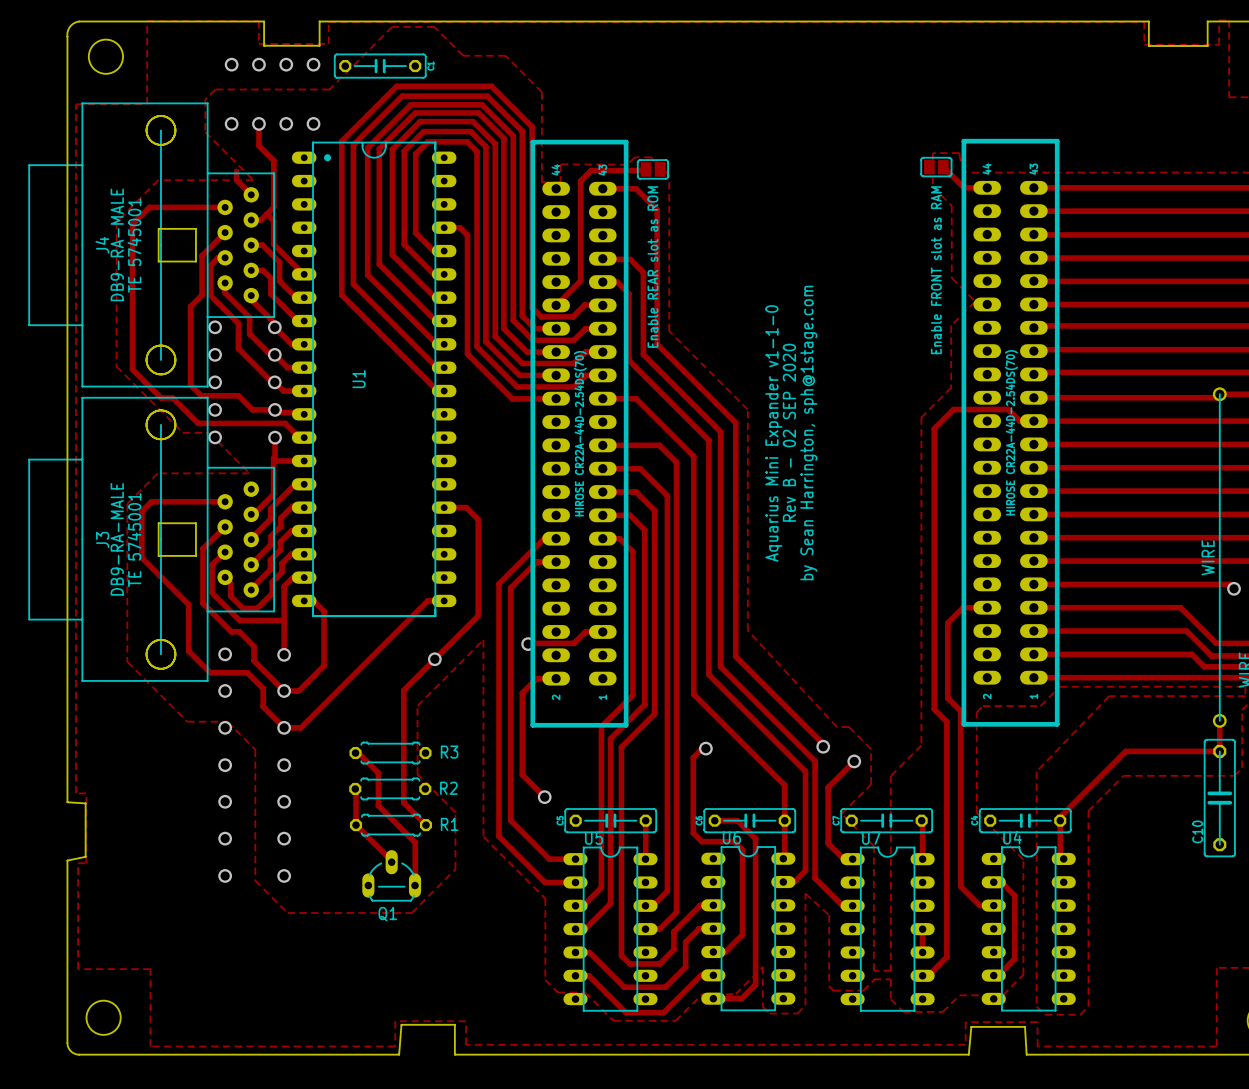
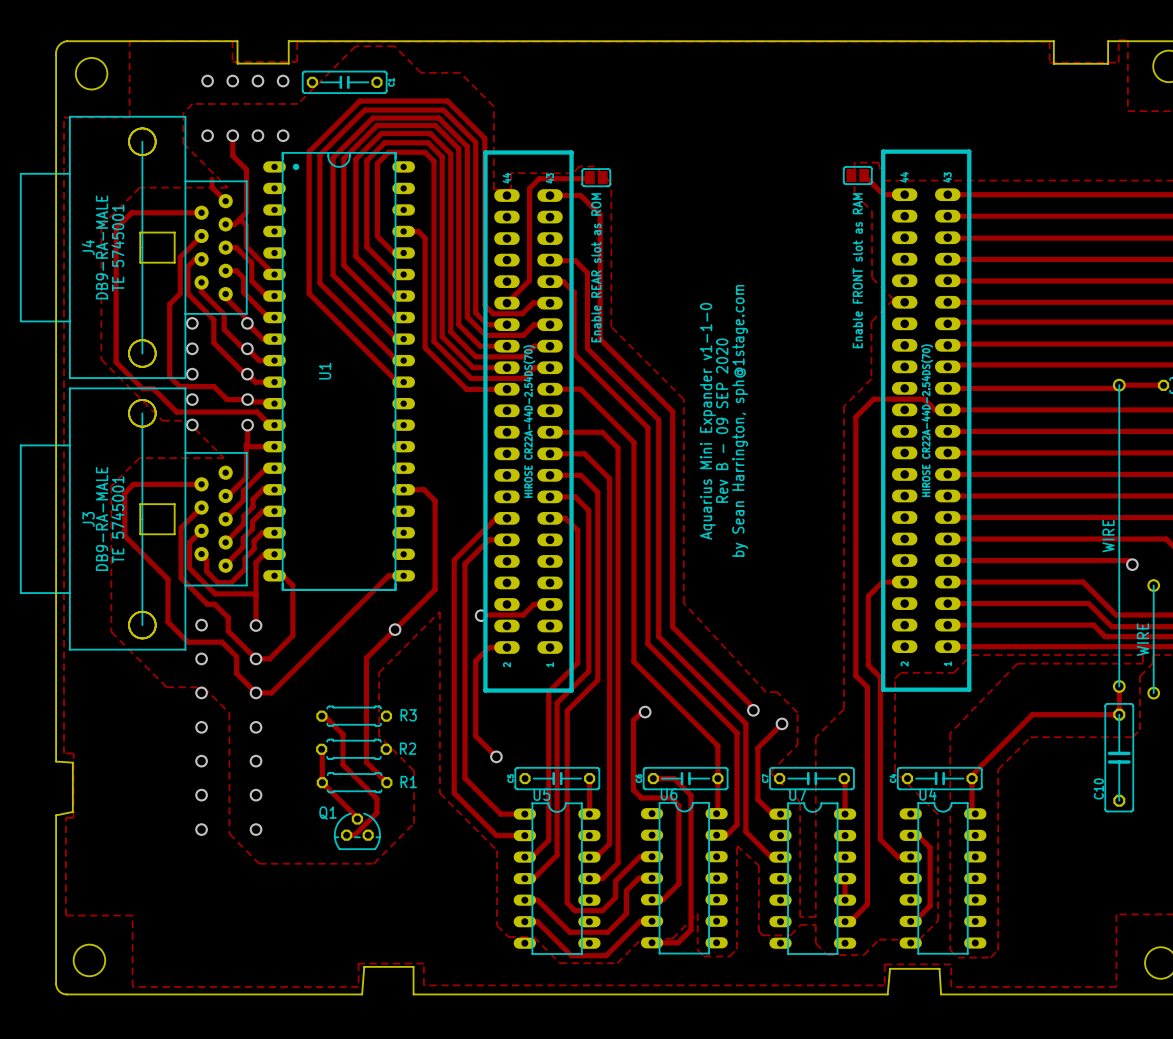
text: Rev B - 02 SEP 2020 (789, 432) -> Rev B - 09 SEP 2020 (722, 420)
Q1 footprint: [362, 850, 422, 902] -> [334, 813, 381, 850]
track: (415, 857) (415, 885) -> (376, 812) (354, 835) (346, 835)
Q1 name position: Q1 (387, 914) -> Q1 (327, 813)

